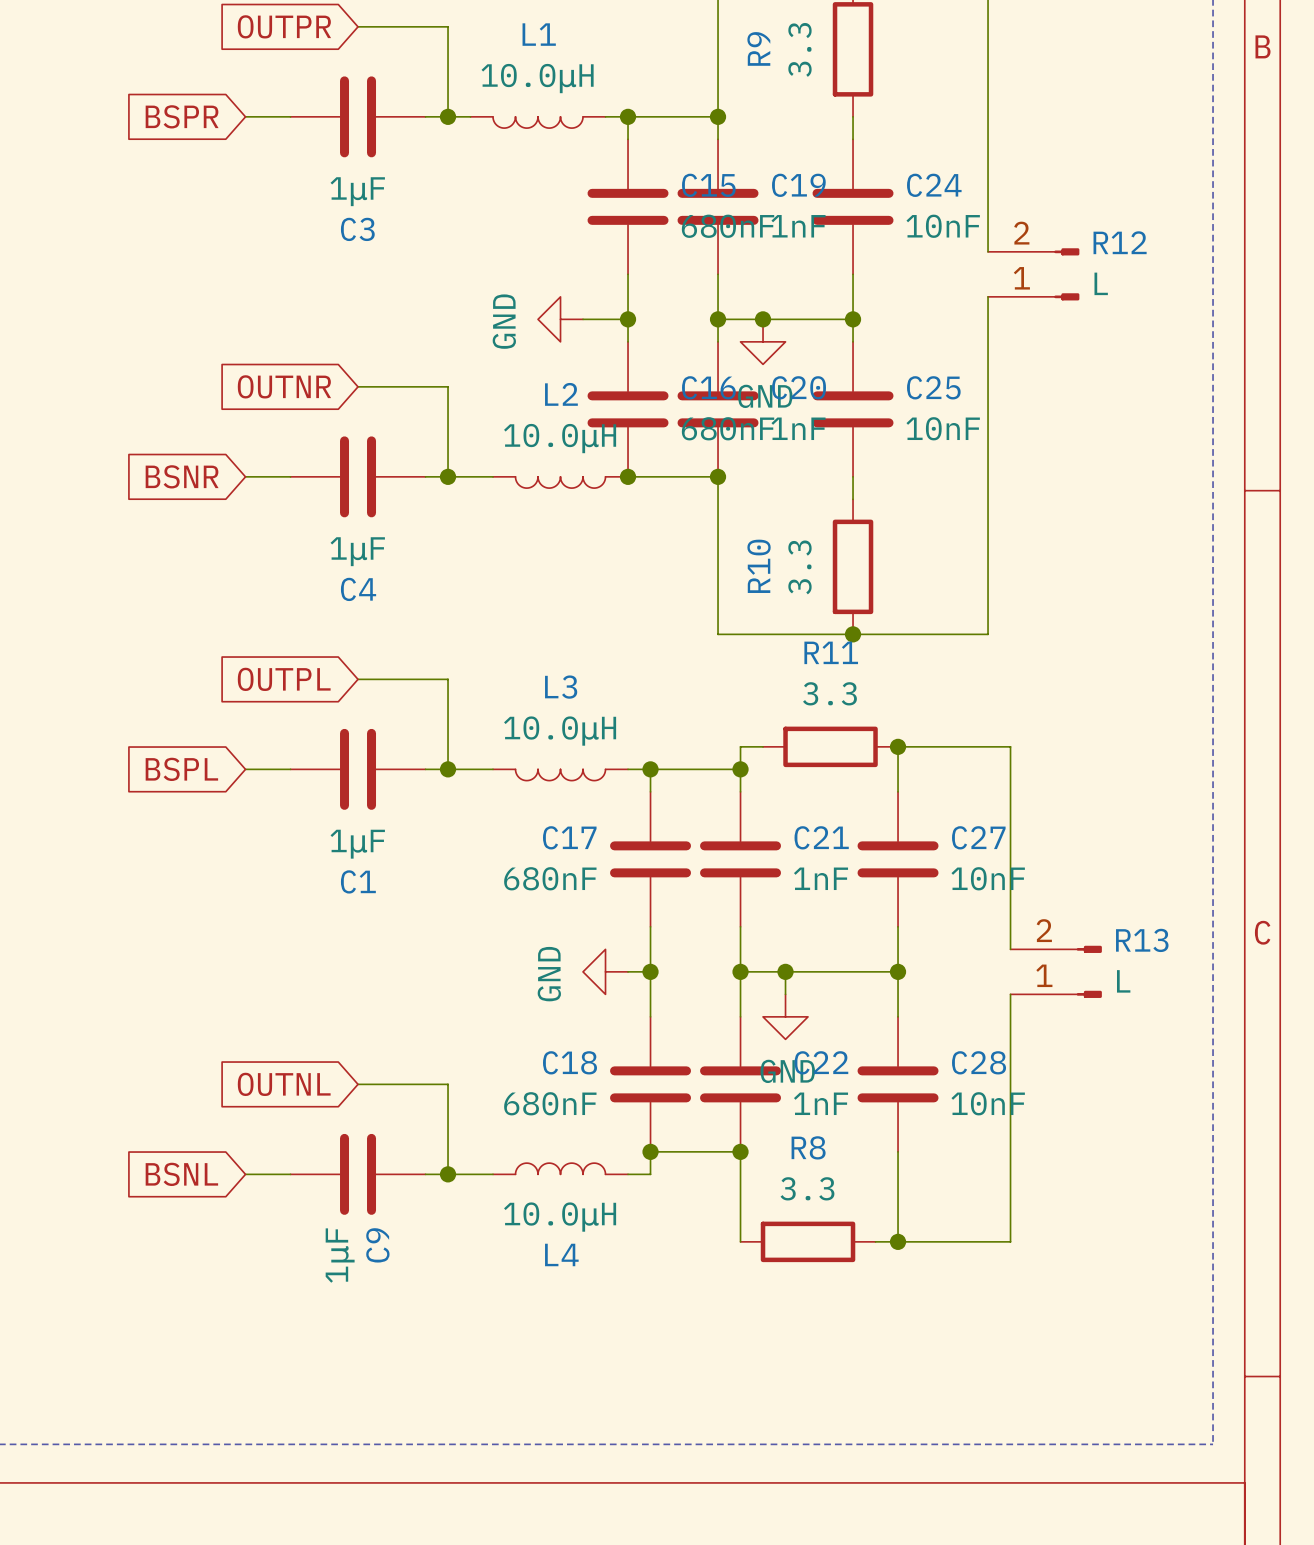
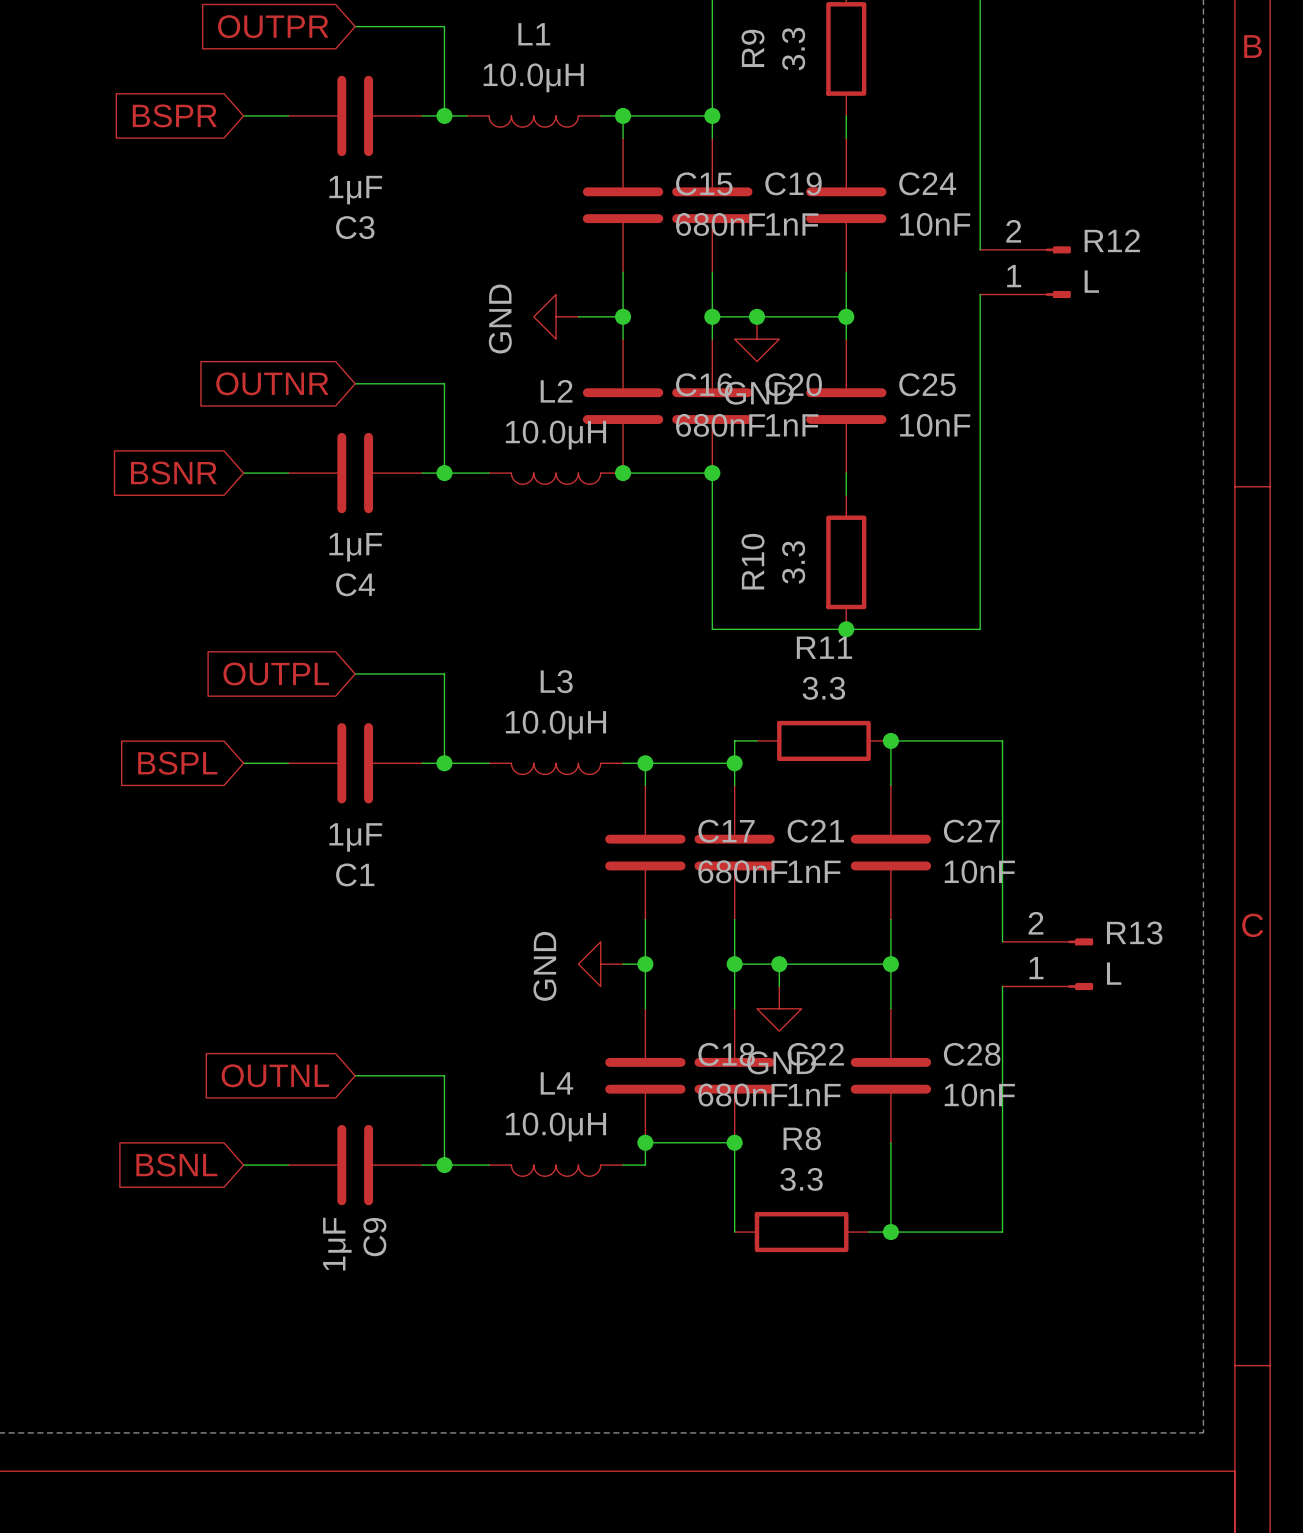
C17 name position: C17 (569, 837) -> C17 (726, 831)
C17 value position: 680nF (550, 878) -> 680nF (742, 871)
C18 name position: C18 (570, 1062) -> C18 (726, 1054)
C18 value position: 680nF (550, 1103) -> 680nF (742, 1095)
L4 rotation: 0° (560, 1168) -> 180° (556, 1170)

